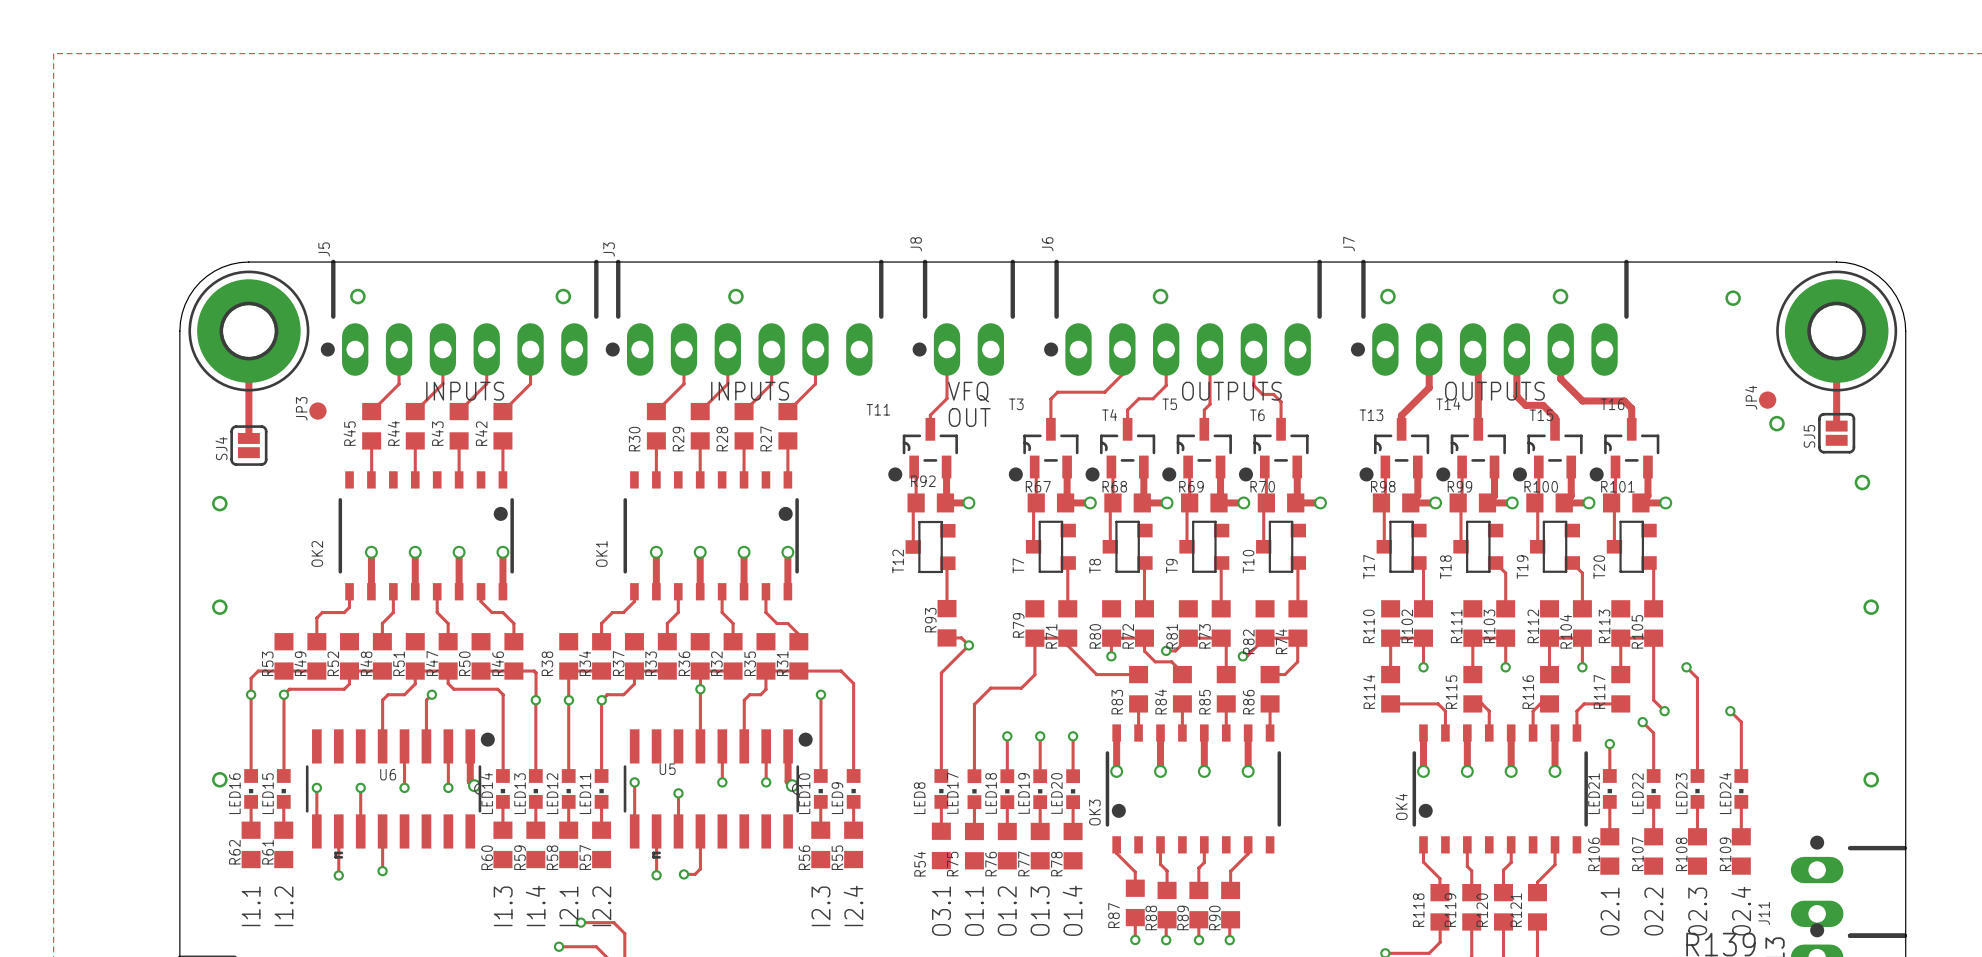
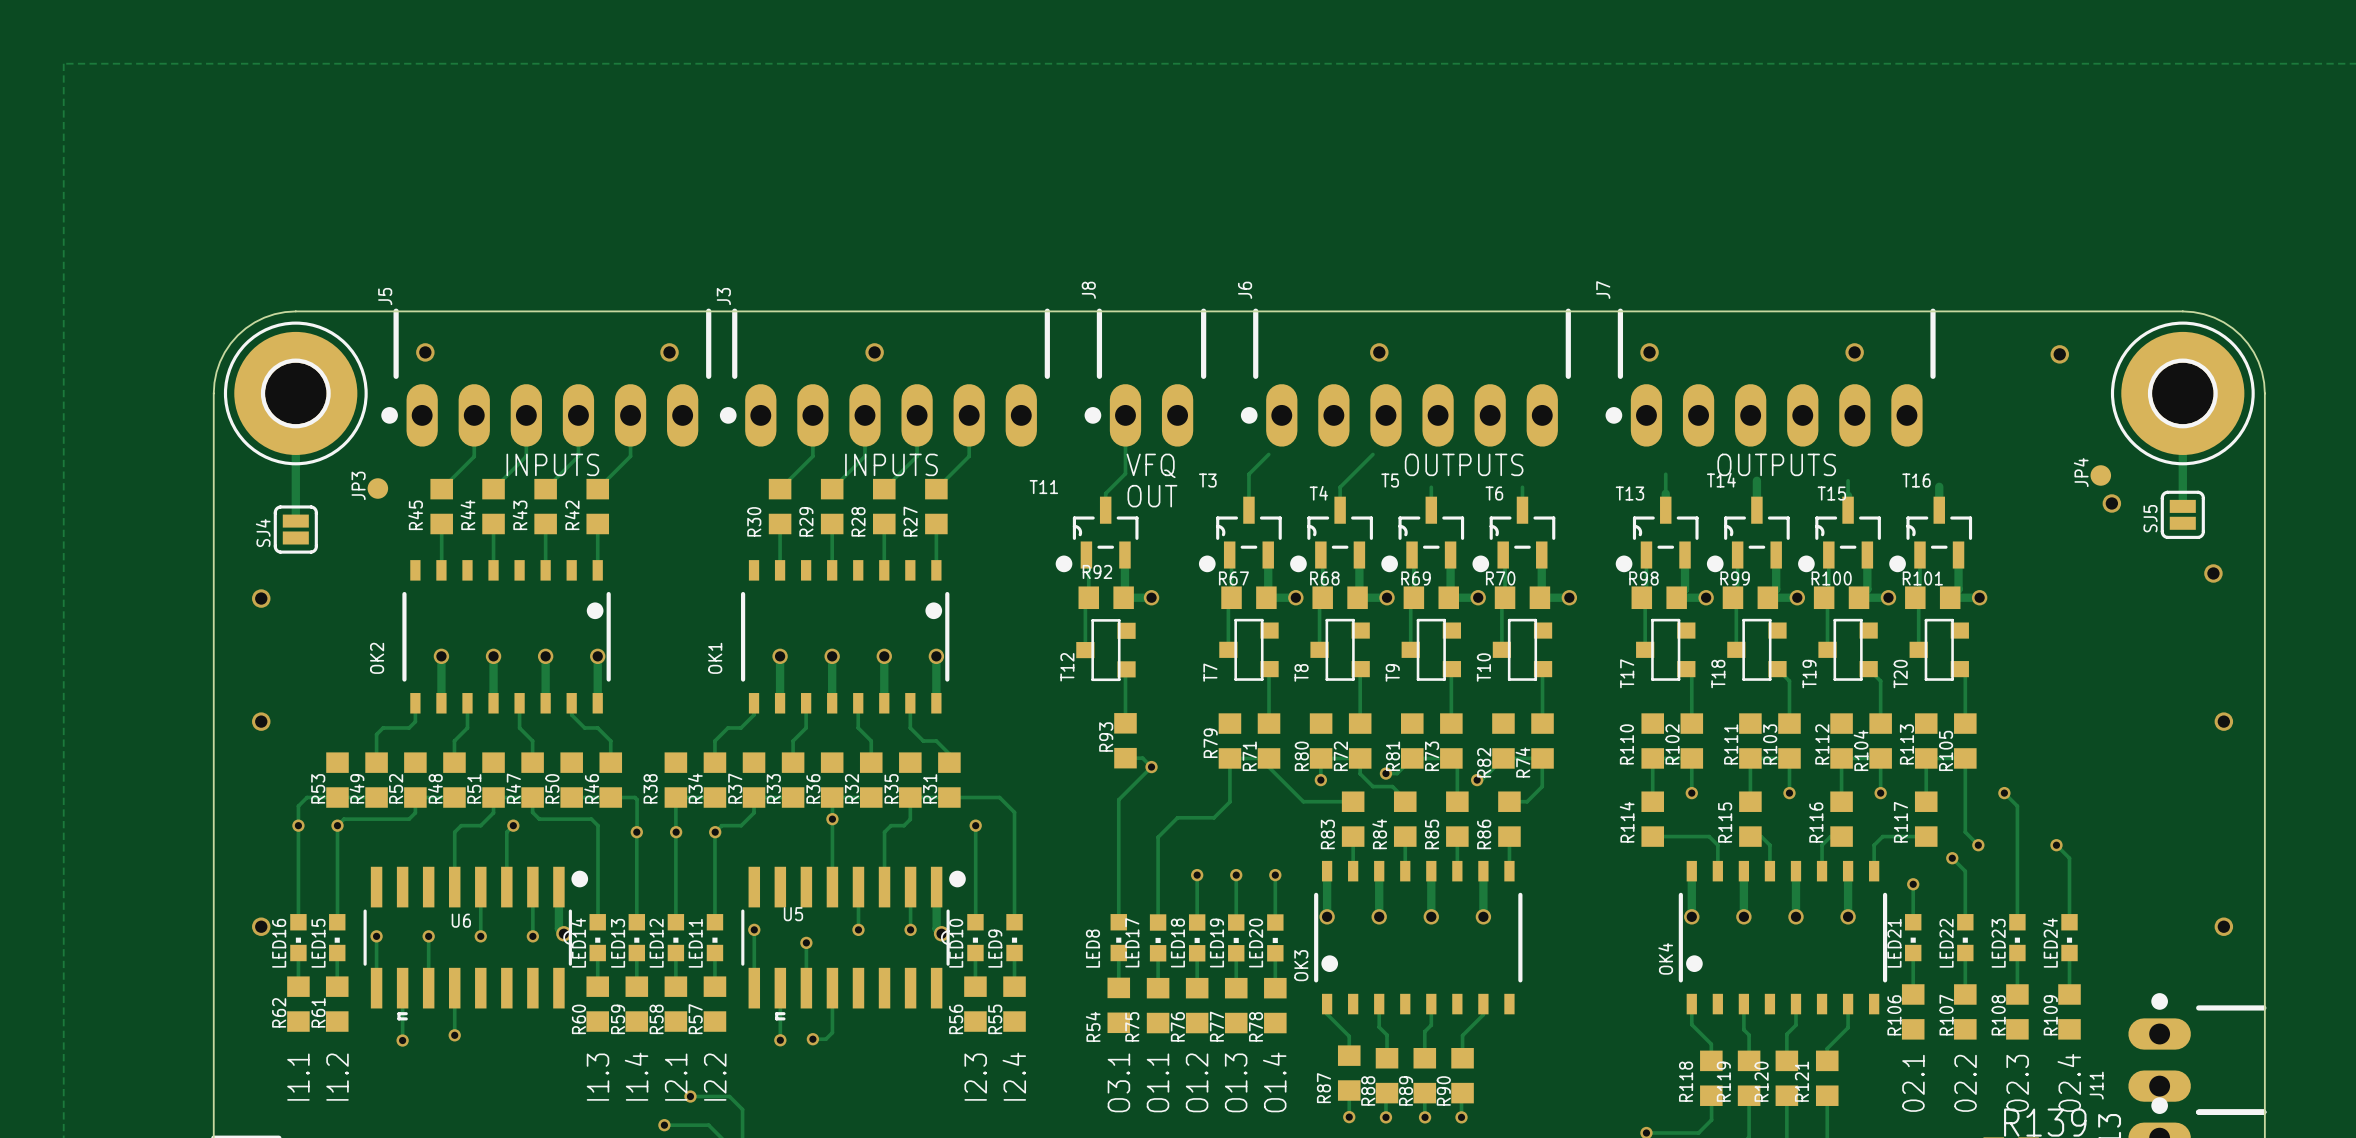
track: (1122, 349) (1122, 374) (1104, 392) (1057, 392) -> (1268, 454) (1257, 466)
track: (1166, 349) (1166, 385) (1153, 398) (1138, 398) -> (1372, 454) (1353, 473)
track: (1210, 349) (1210, 404) (1204, 410) -> none
track: (1253, 349) (1253, 385) (1262, 394) (1273, 394) (1281, 401) (1281, 410) -> none
track: (1429, 349) (1429, 387) (1401, 415) -> (1665, 474) (1665, 493)
track: (1473, 349) (1478, 354) (1478, 404) -> none
track: (1516, 349) (1516, 396) (1525, 405) (1543, 405) (1555, 417) -> (1848, 480) (1848, 495)
track: (1560, 349) (1560, 379) (1582, 400) (1624, 400) (1631, 409) -> none

